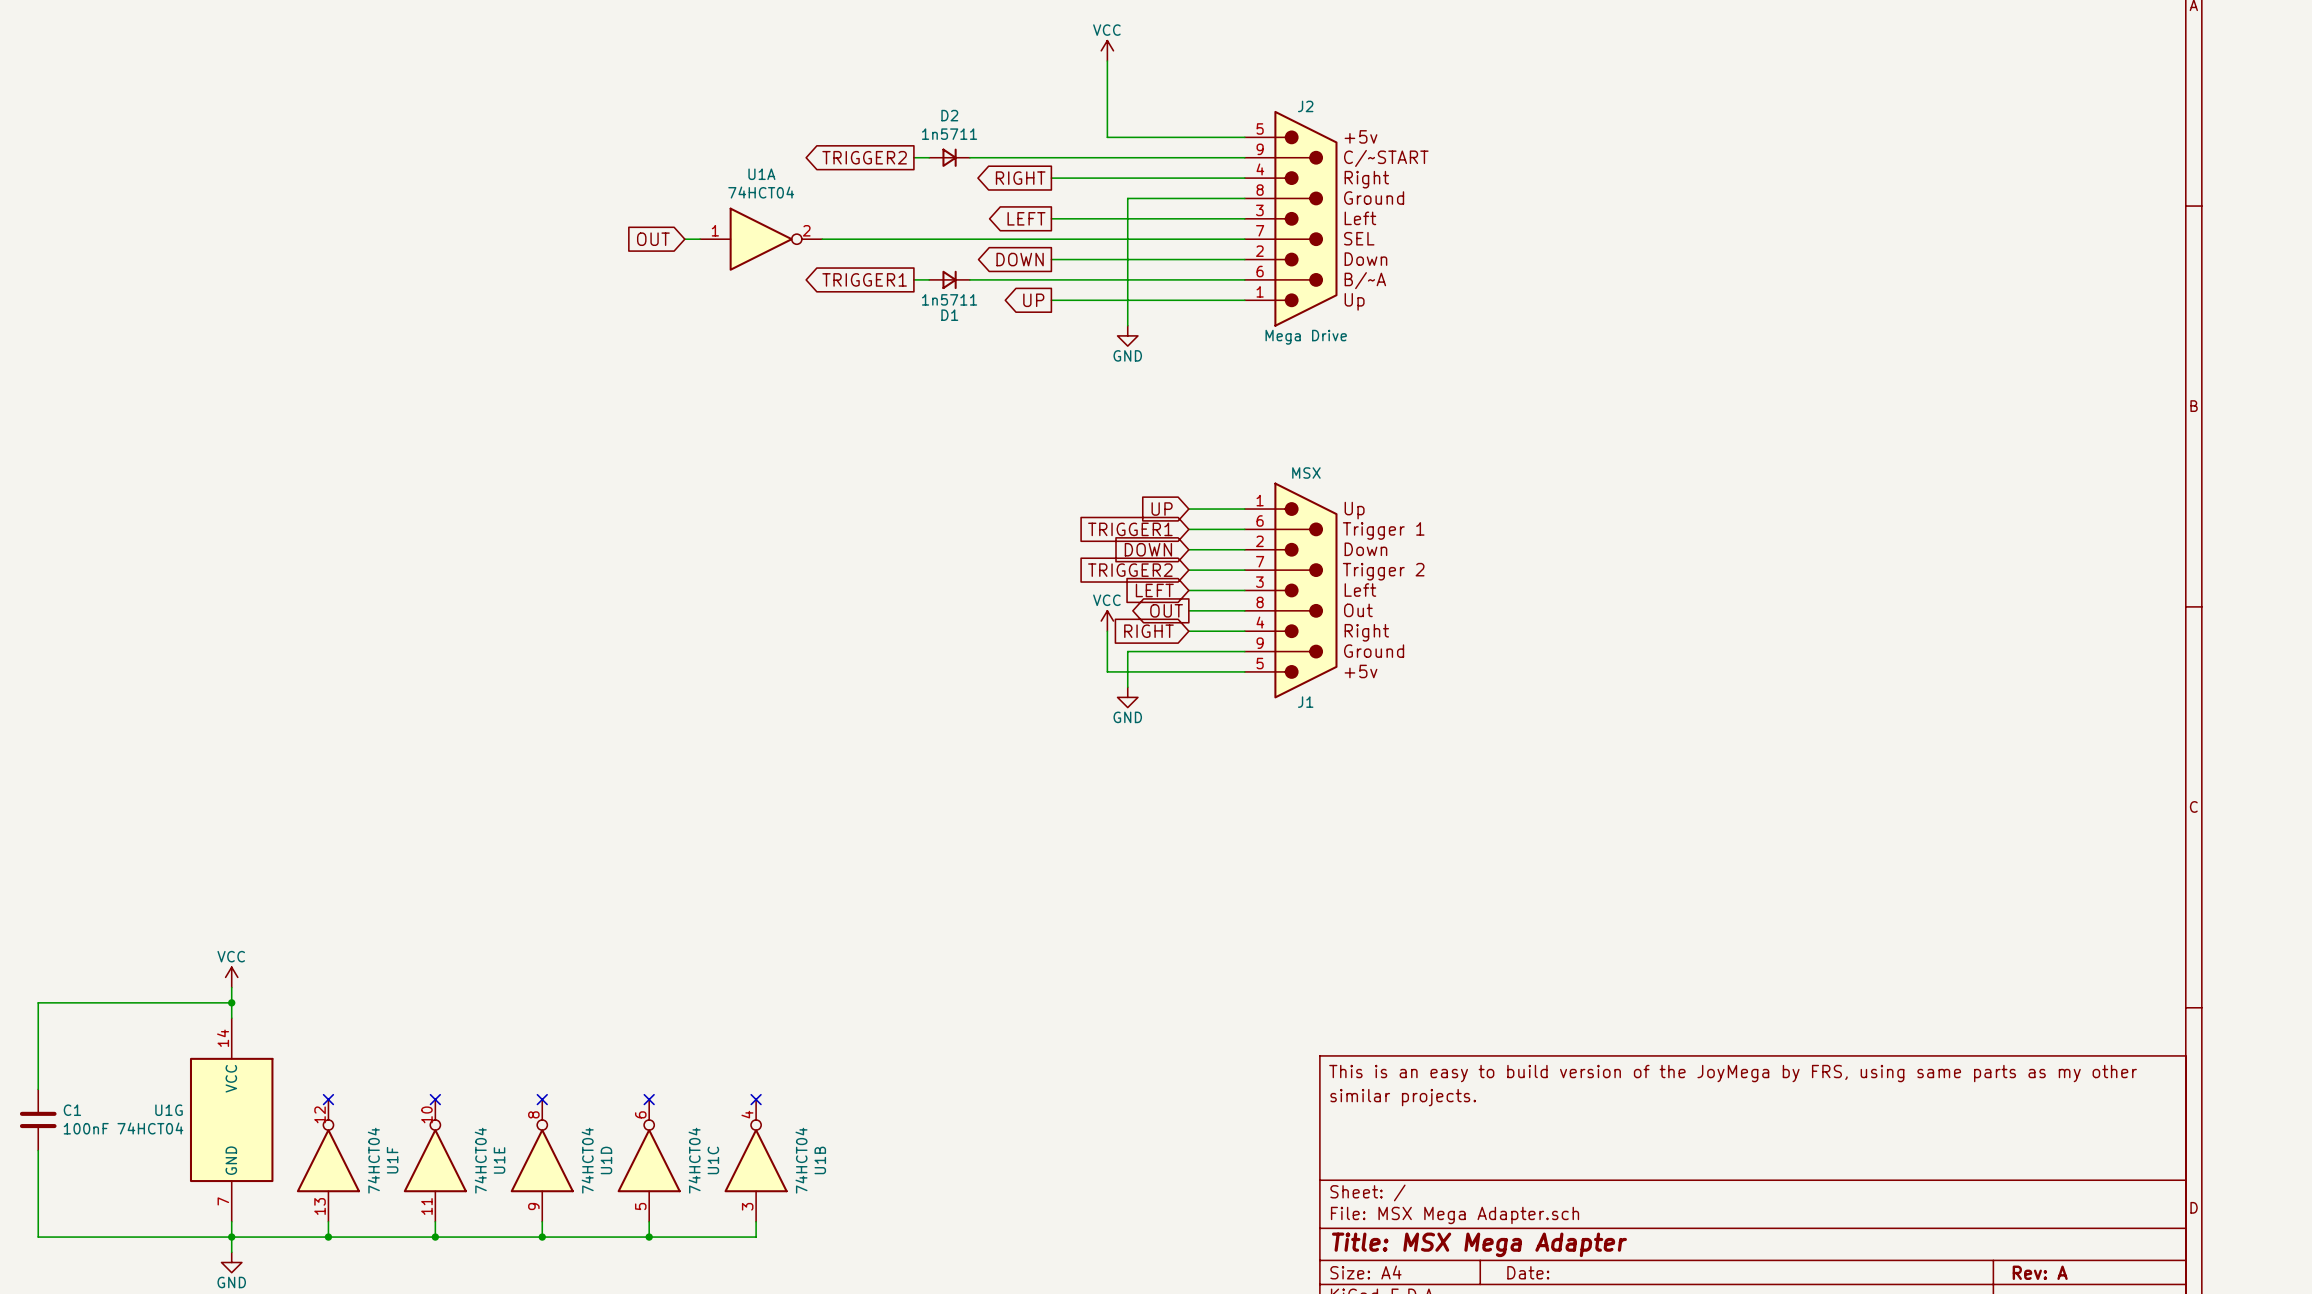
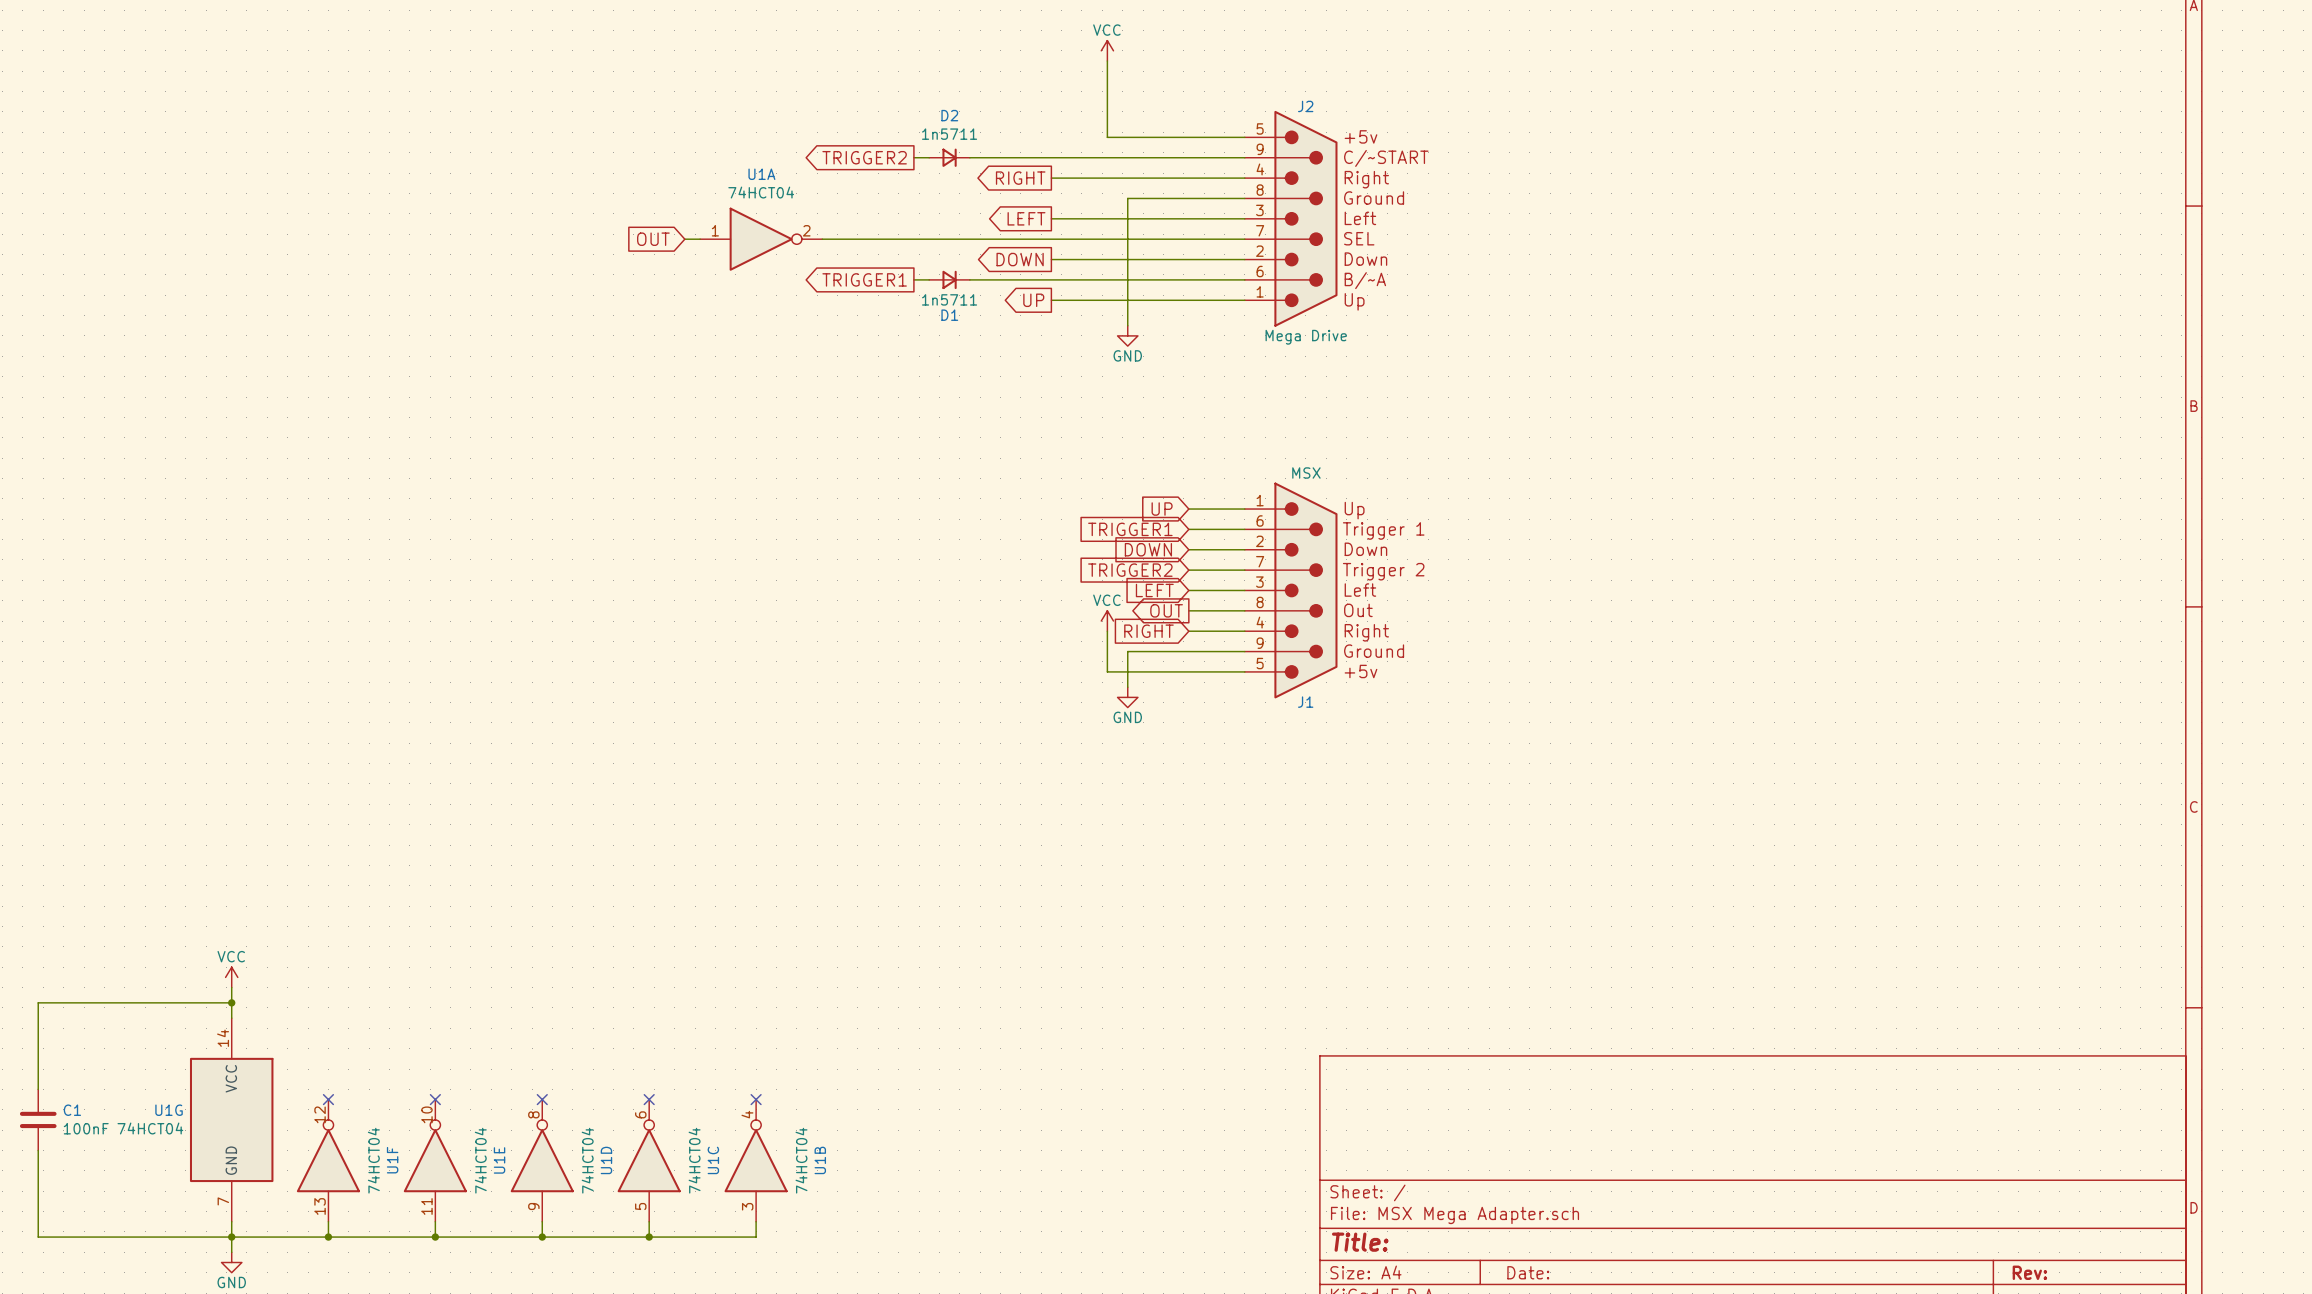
title block: This is an easy to build version of the JoyMega by FRS, using same parts as my other (1733, 1073) -> none
title block: similar projects. (1403, 1097) -> none
title block: Title: MSX Mega Adapter (1479, 1244) -> Title: (1360, 1242)
title block: Rev: A (2040, 1272) -> Rev: (2029, 1272)

